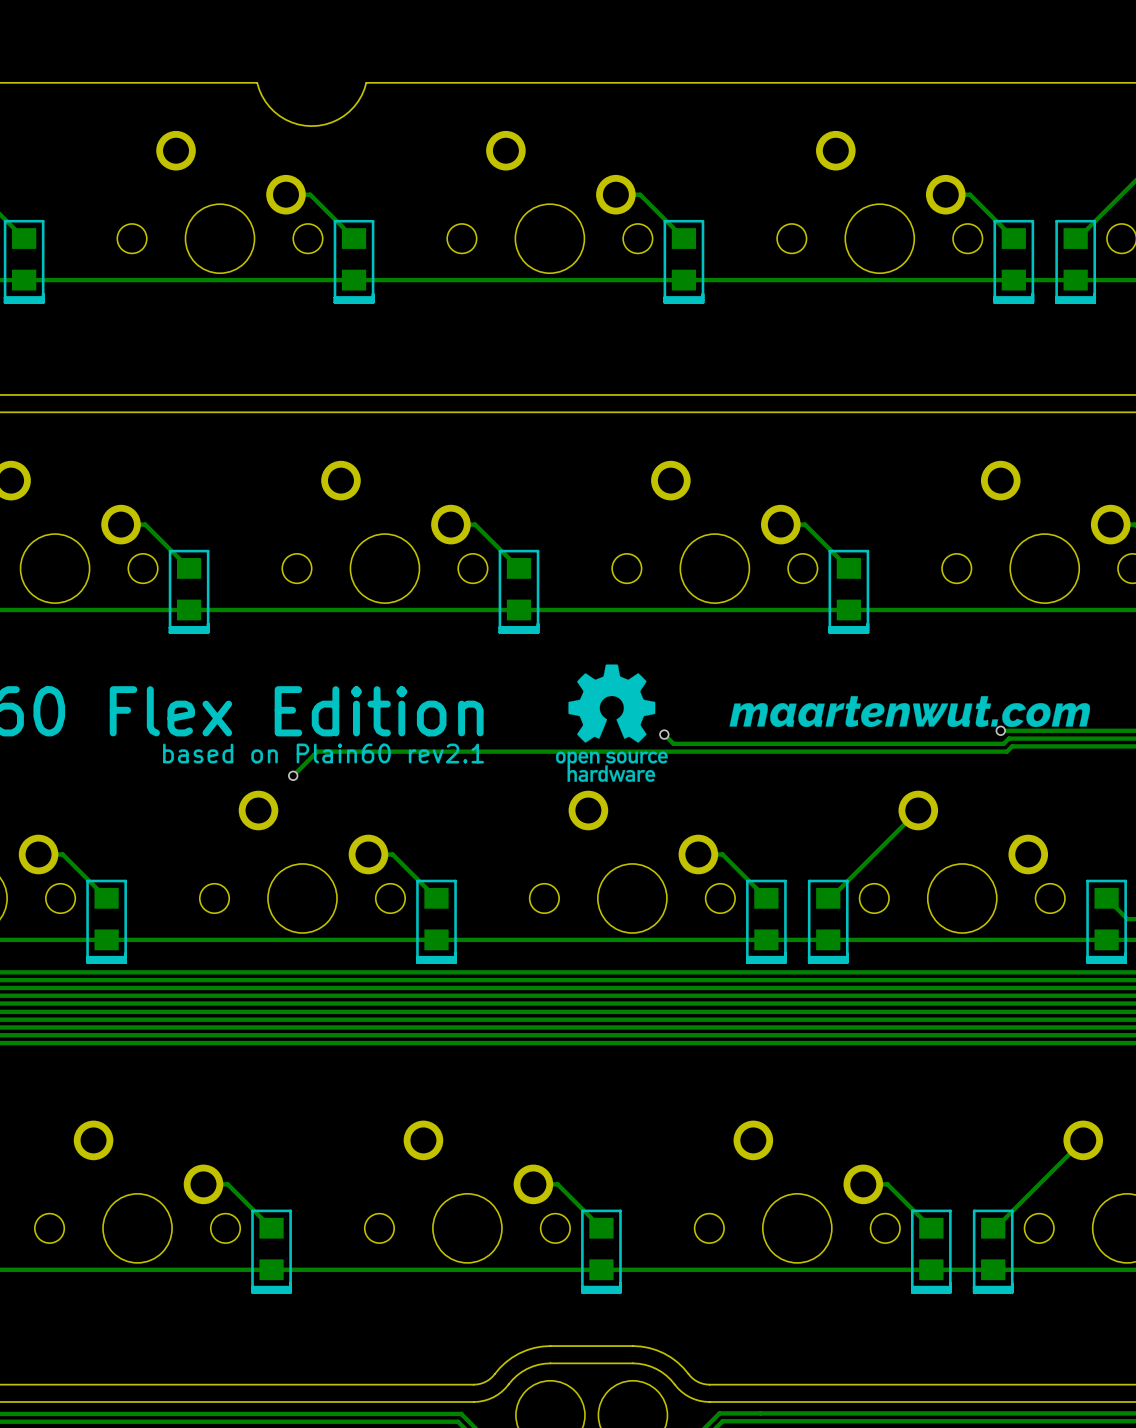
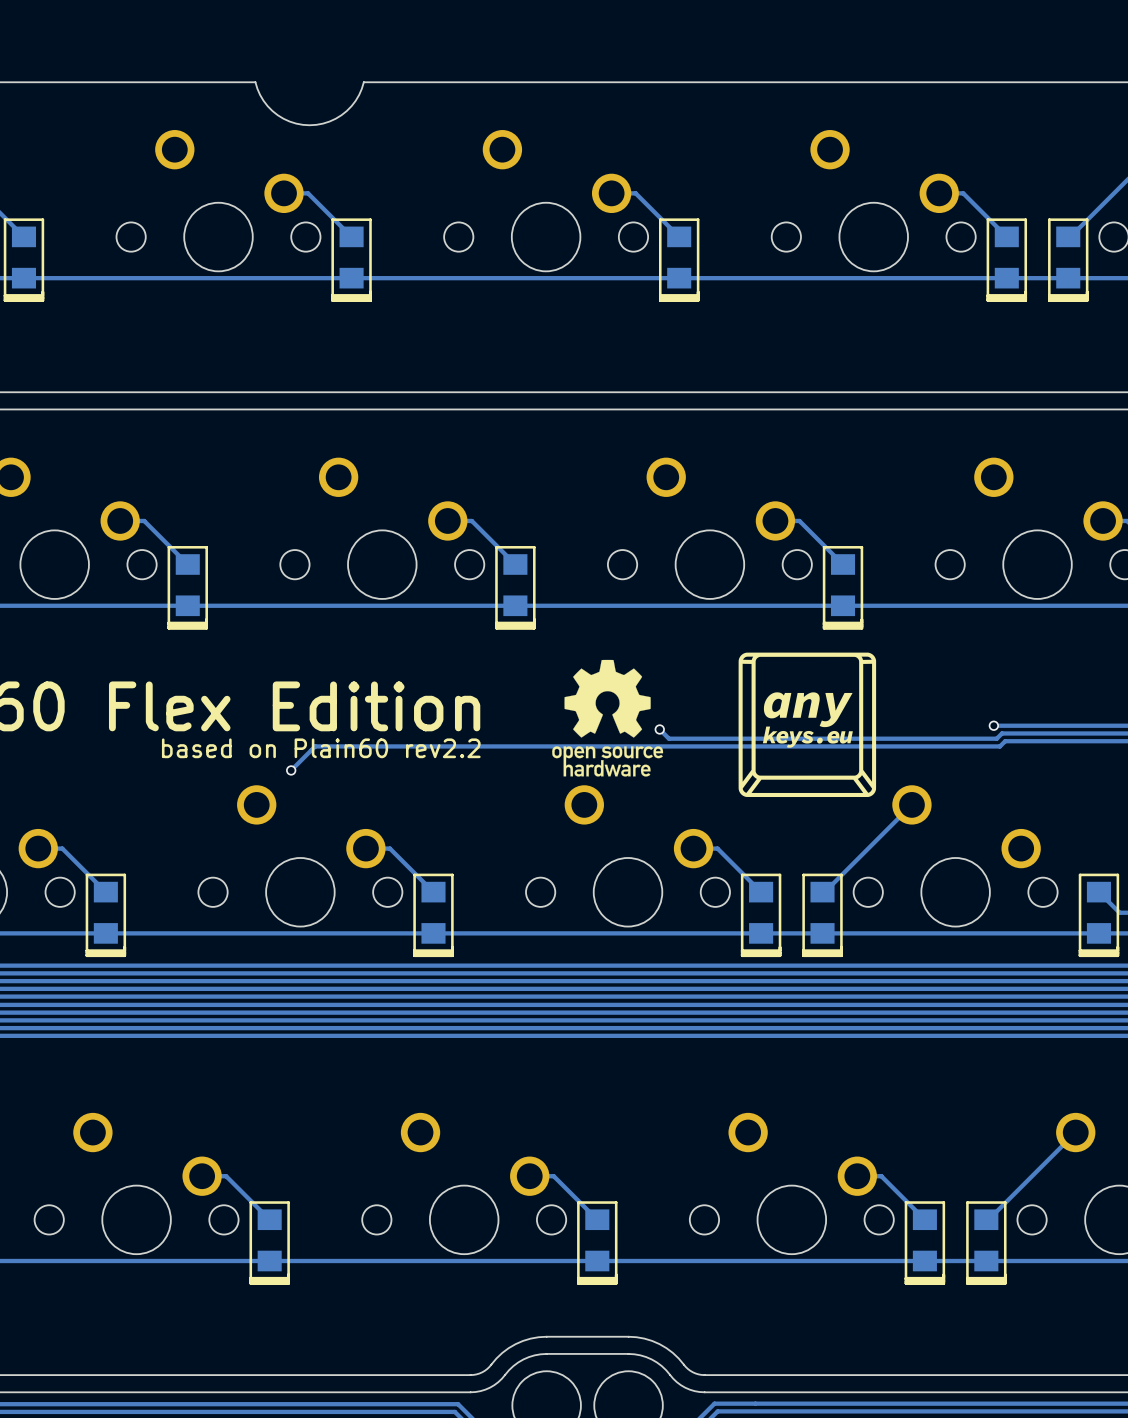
drawing: none -> [738, 652, 877, 798]
drawing: [729, 696, 1090, 728] -> none
text: based on Plain60 rev2.1 (323, 753) -> based on Plain60 rev2.2 (321, 748)

